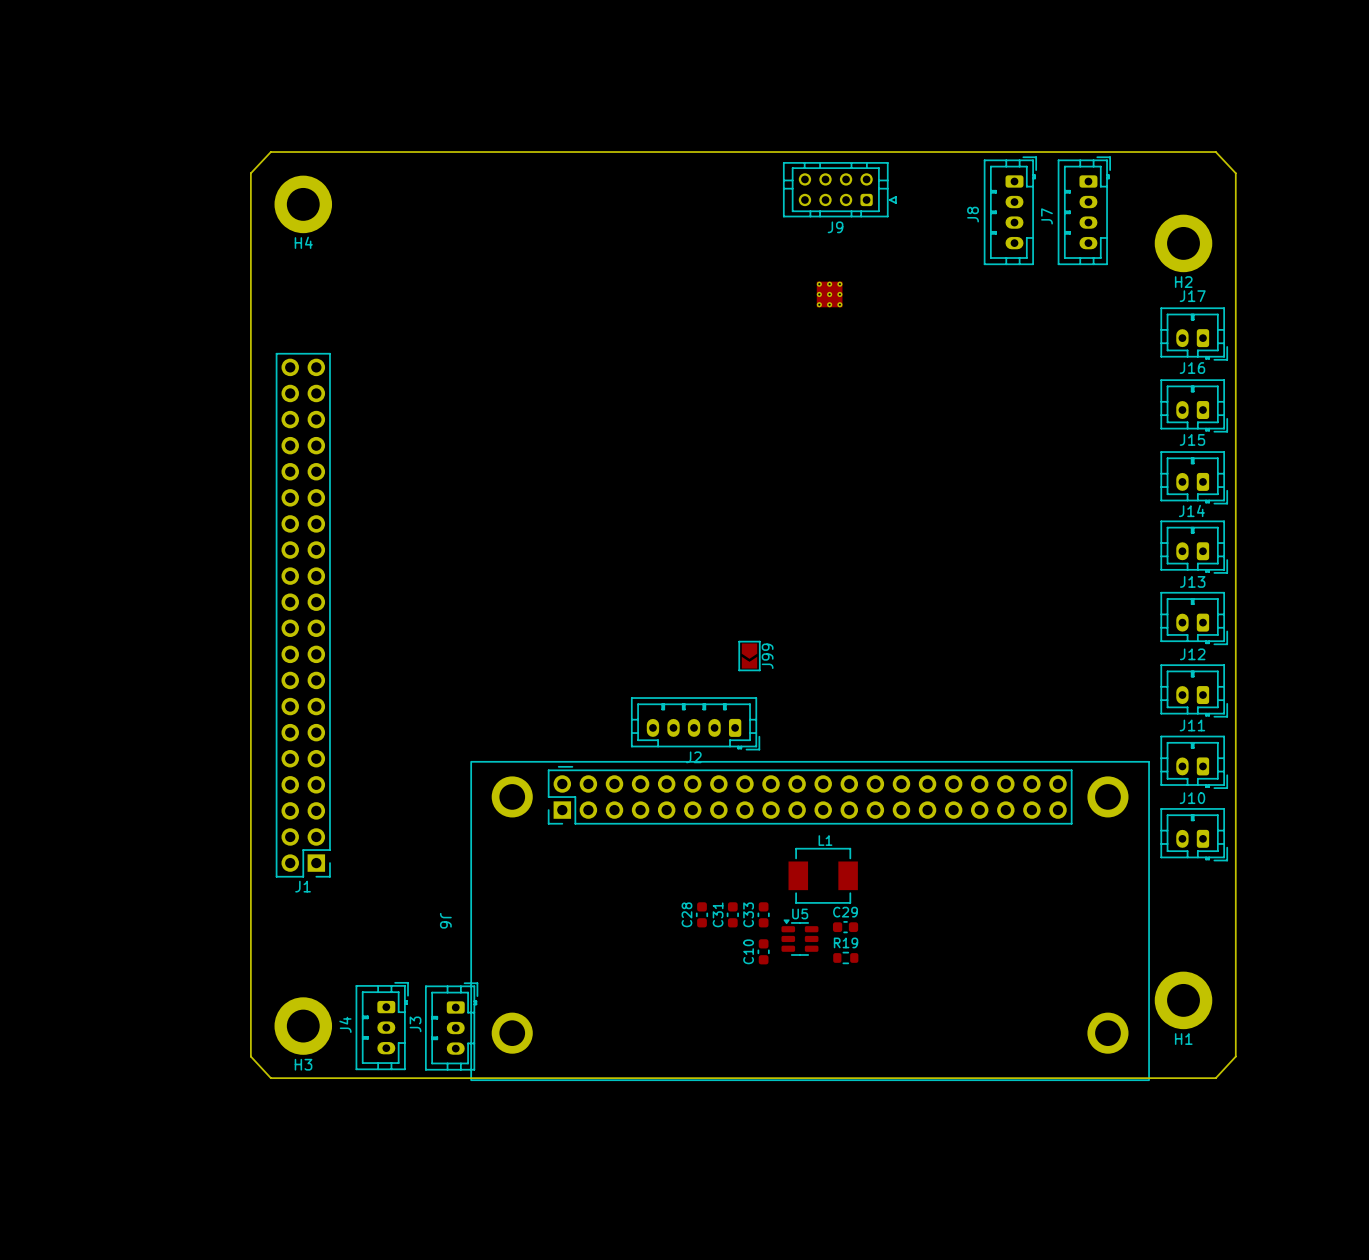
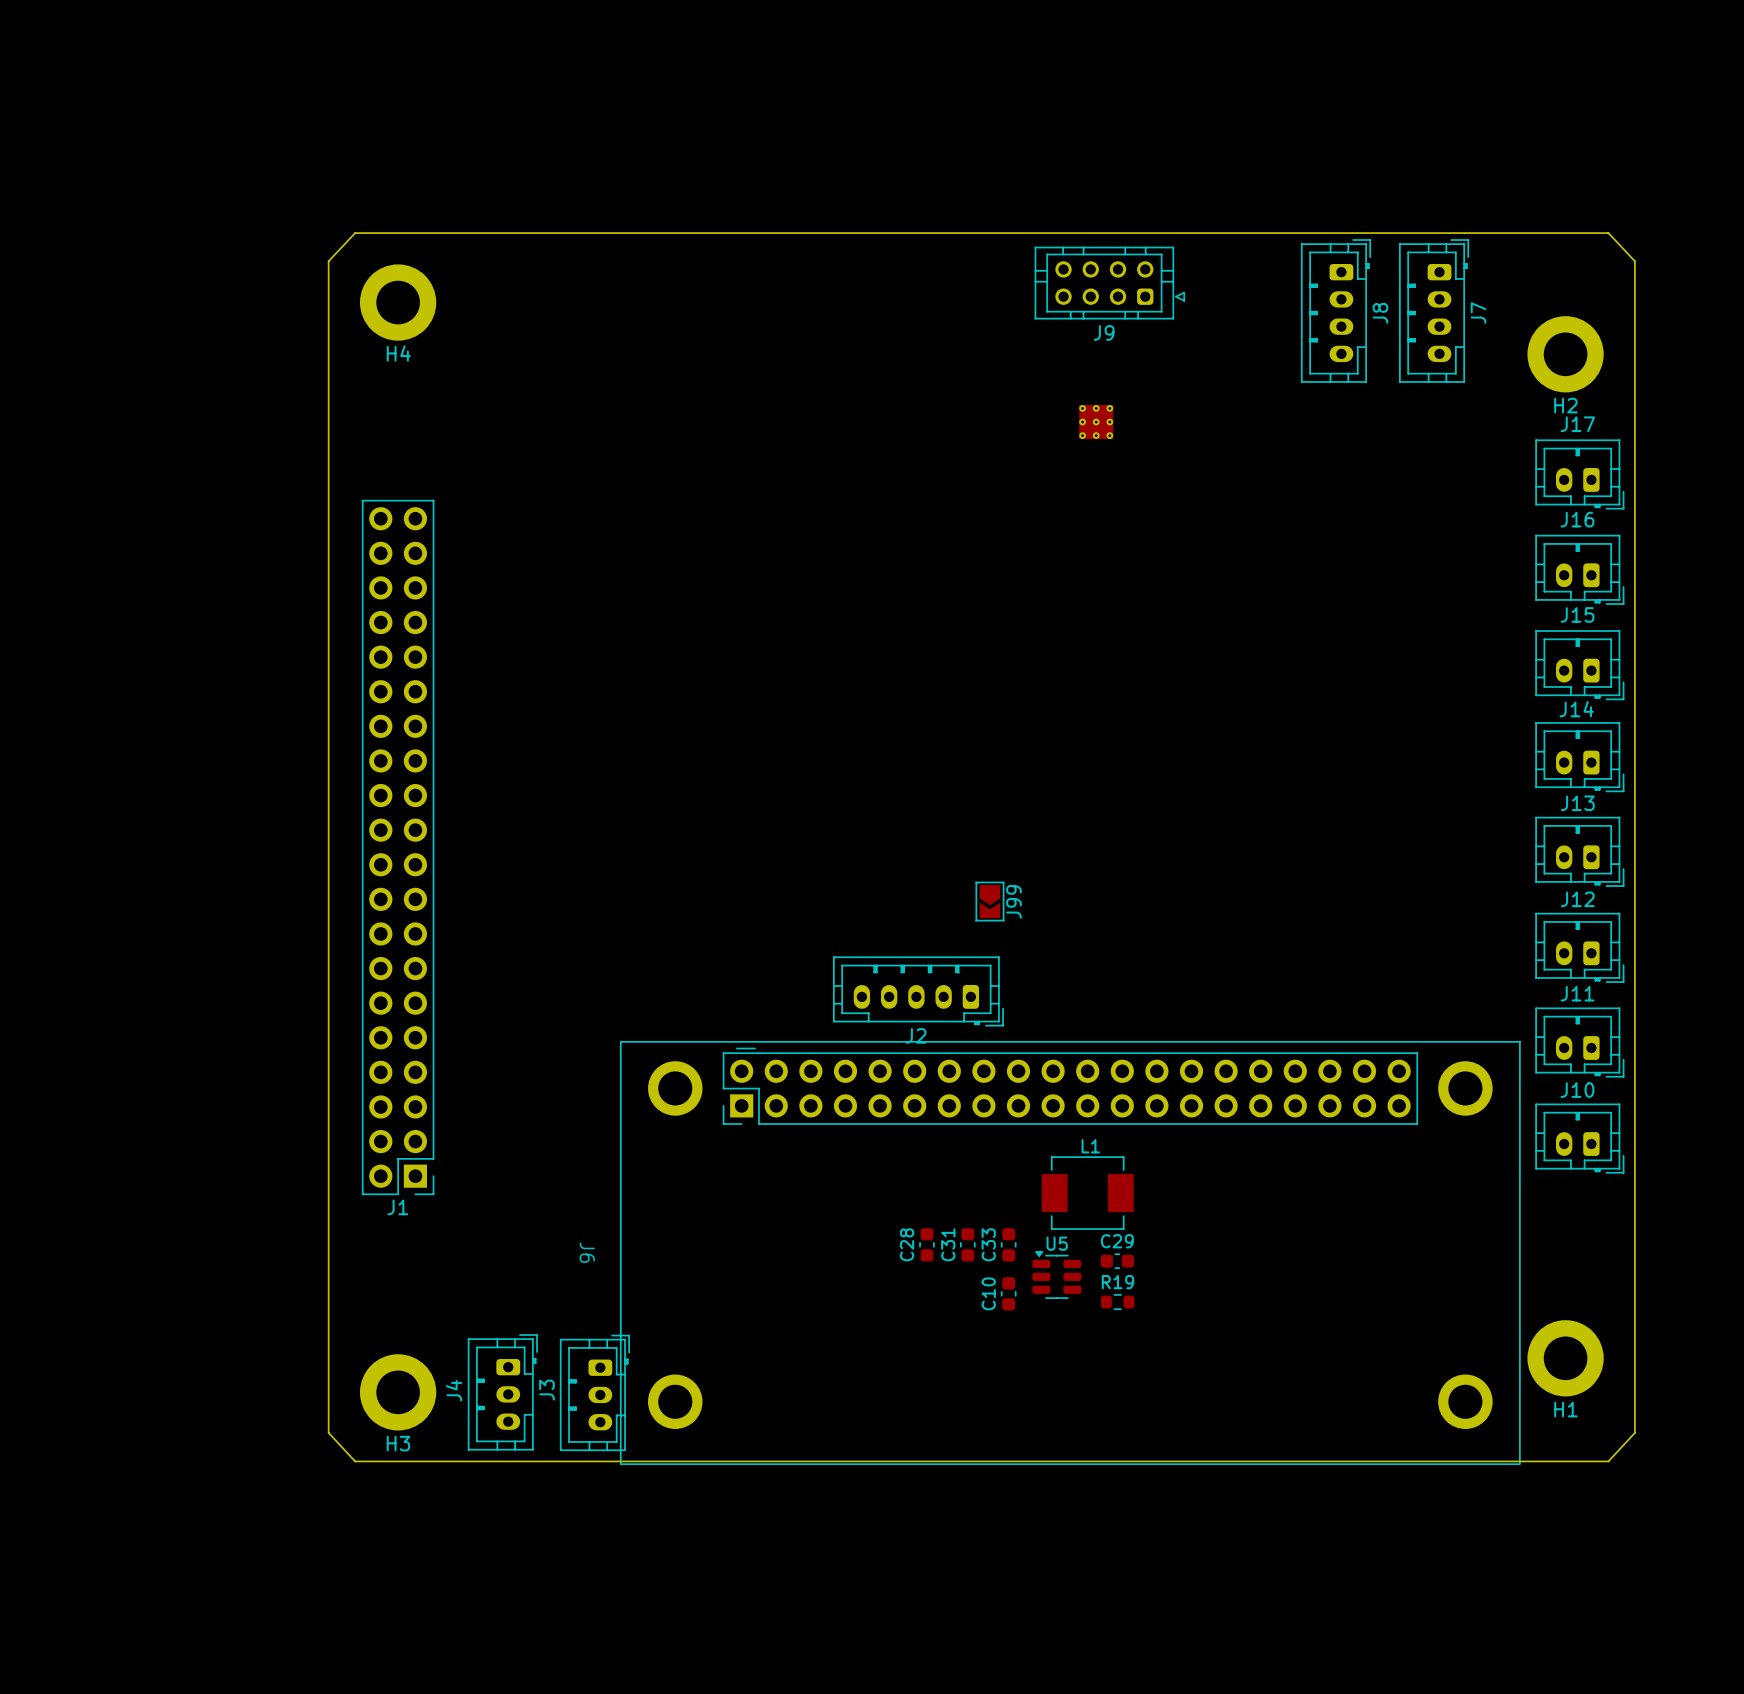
J8 name position: J8 (973, 214) -> J8 (1380, 313)
J7 name position: J7 (1046, 216) -> J7 (1478, 313)

